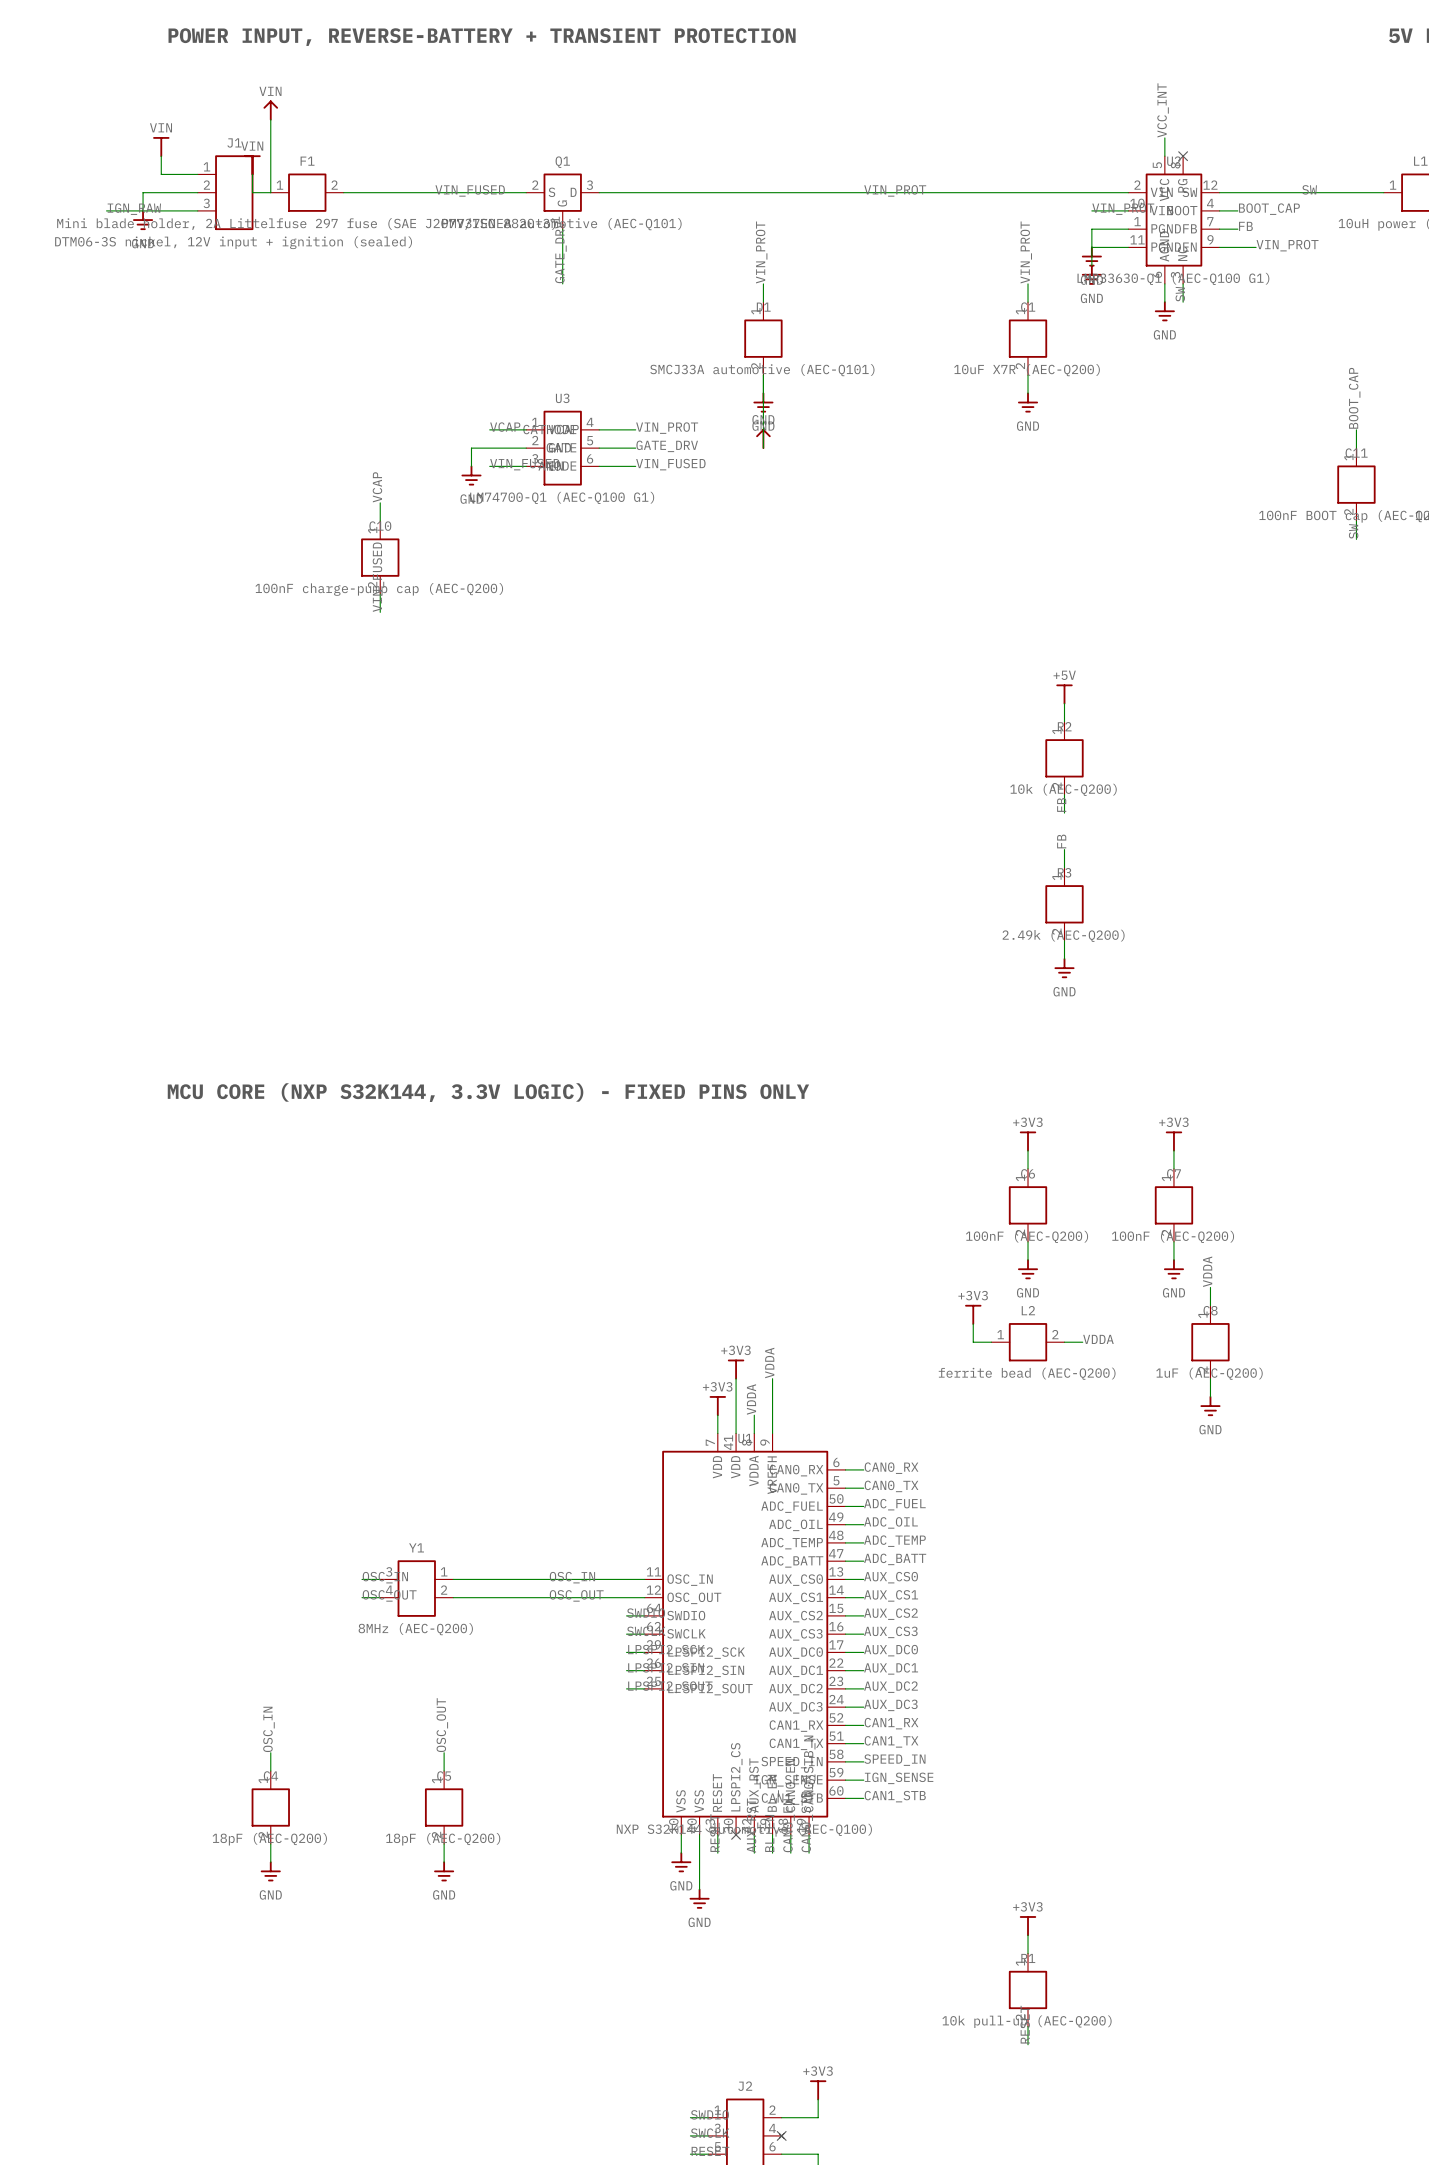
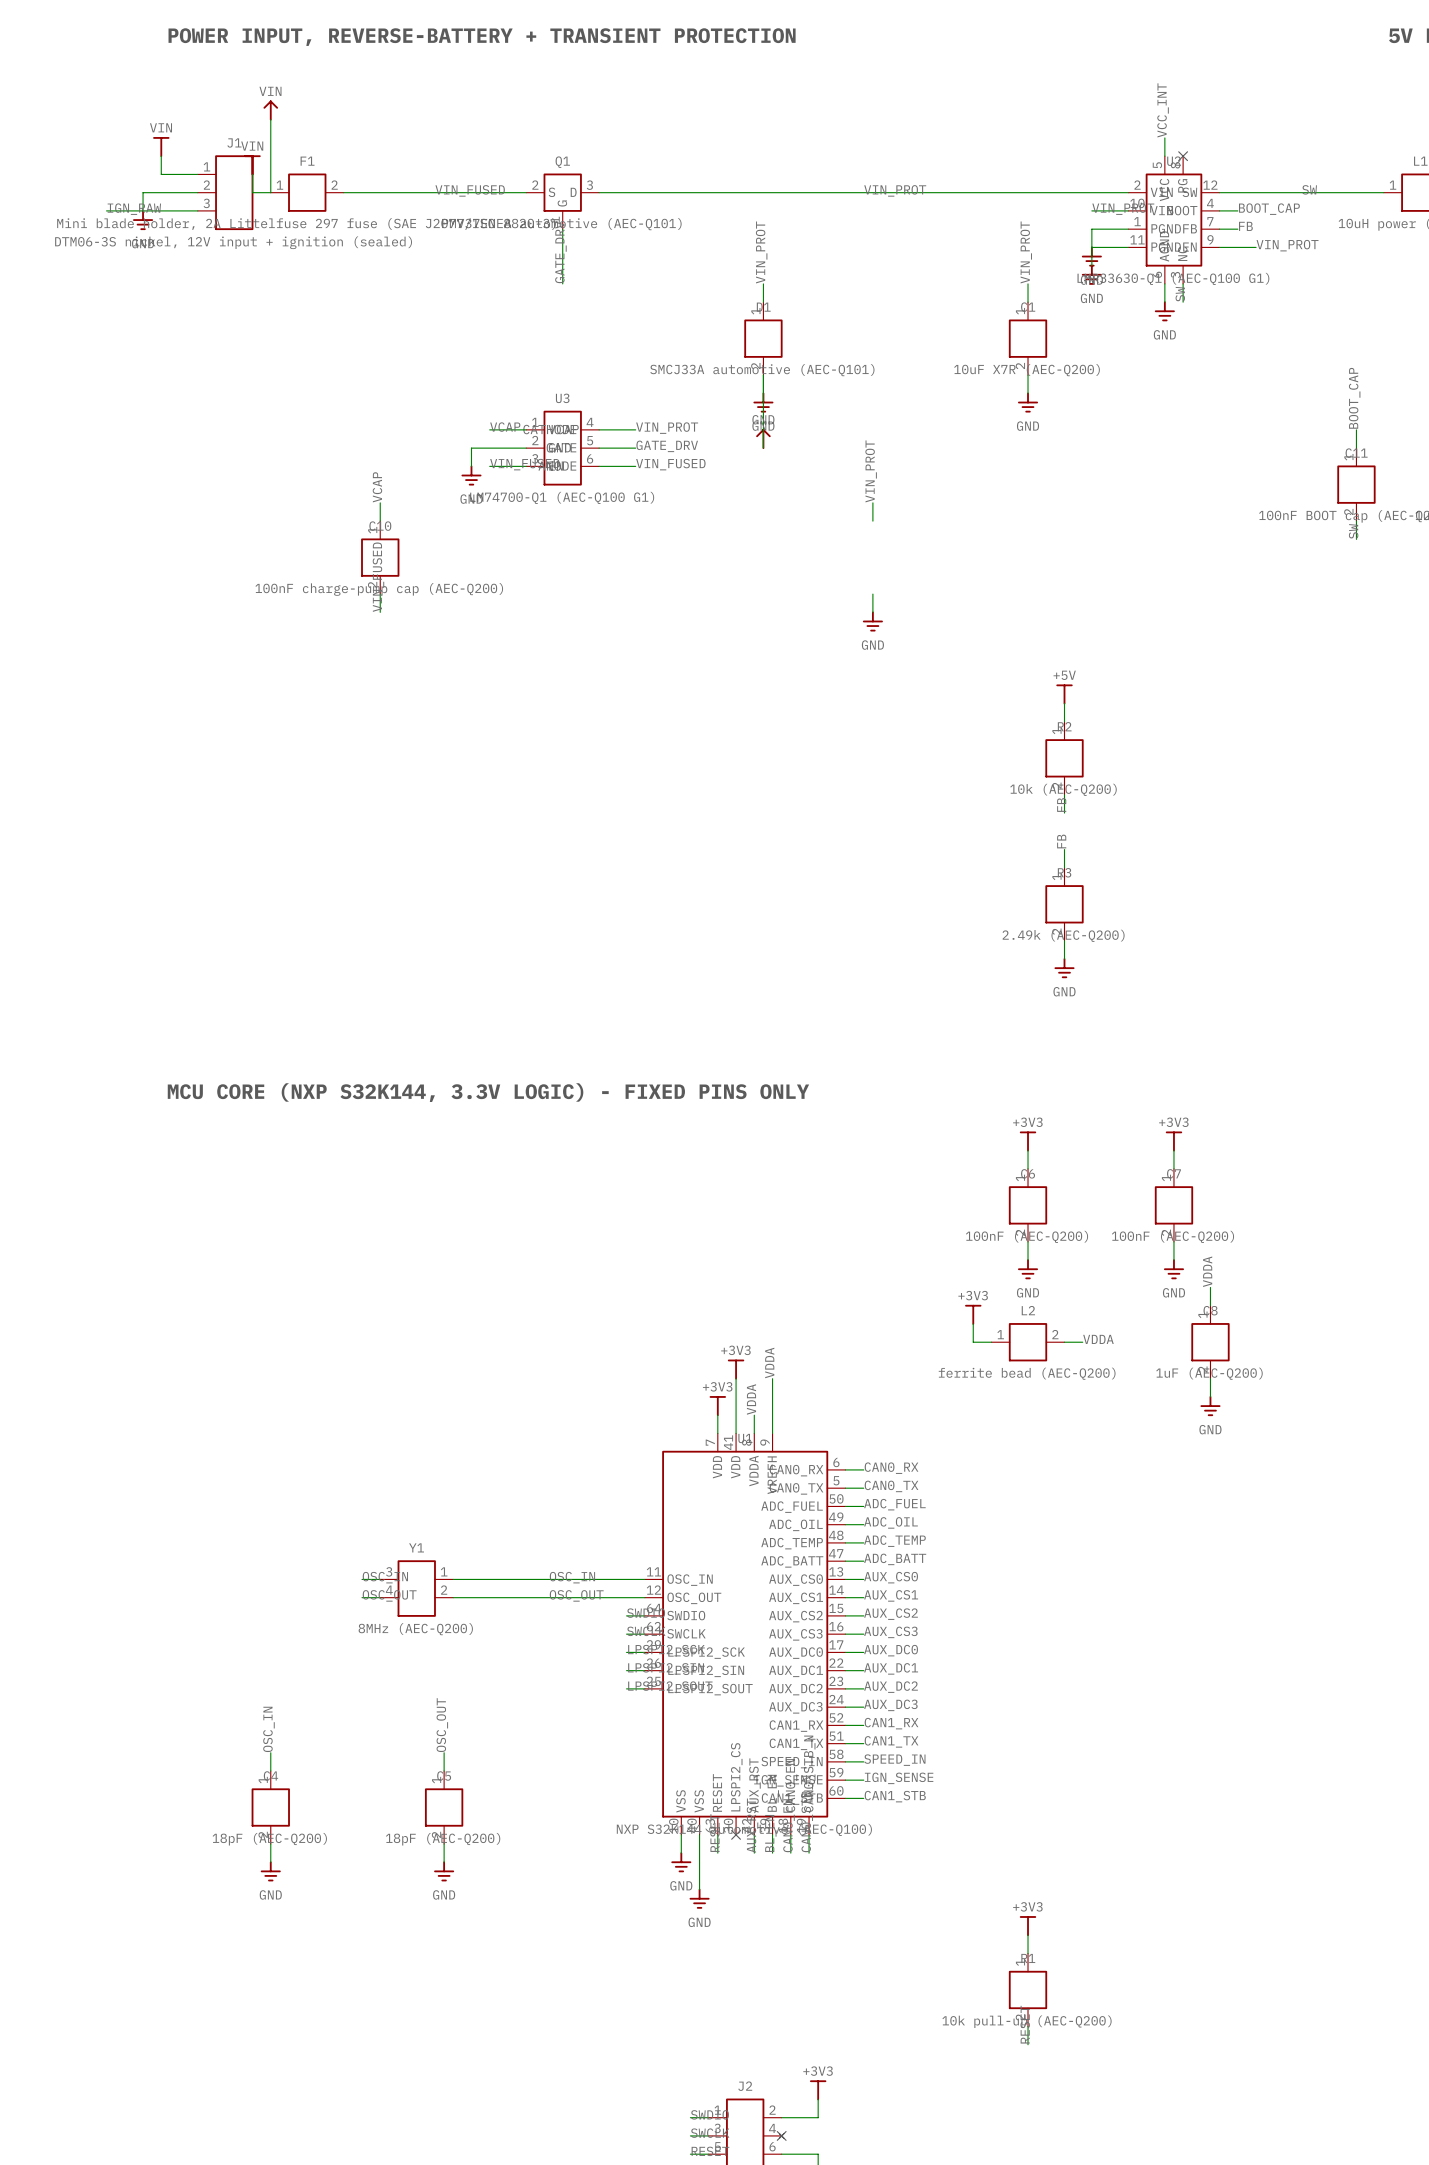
label: none -> VIN_PROT (871, 471)
wire: none -> (872, 502) (872, 521)
wire: none -> (872, 594) (872, 612)
power symbol: none -> GND (872, 621)

